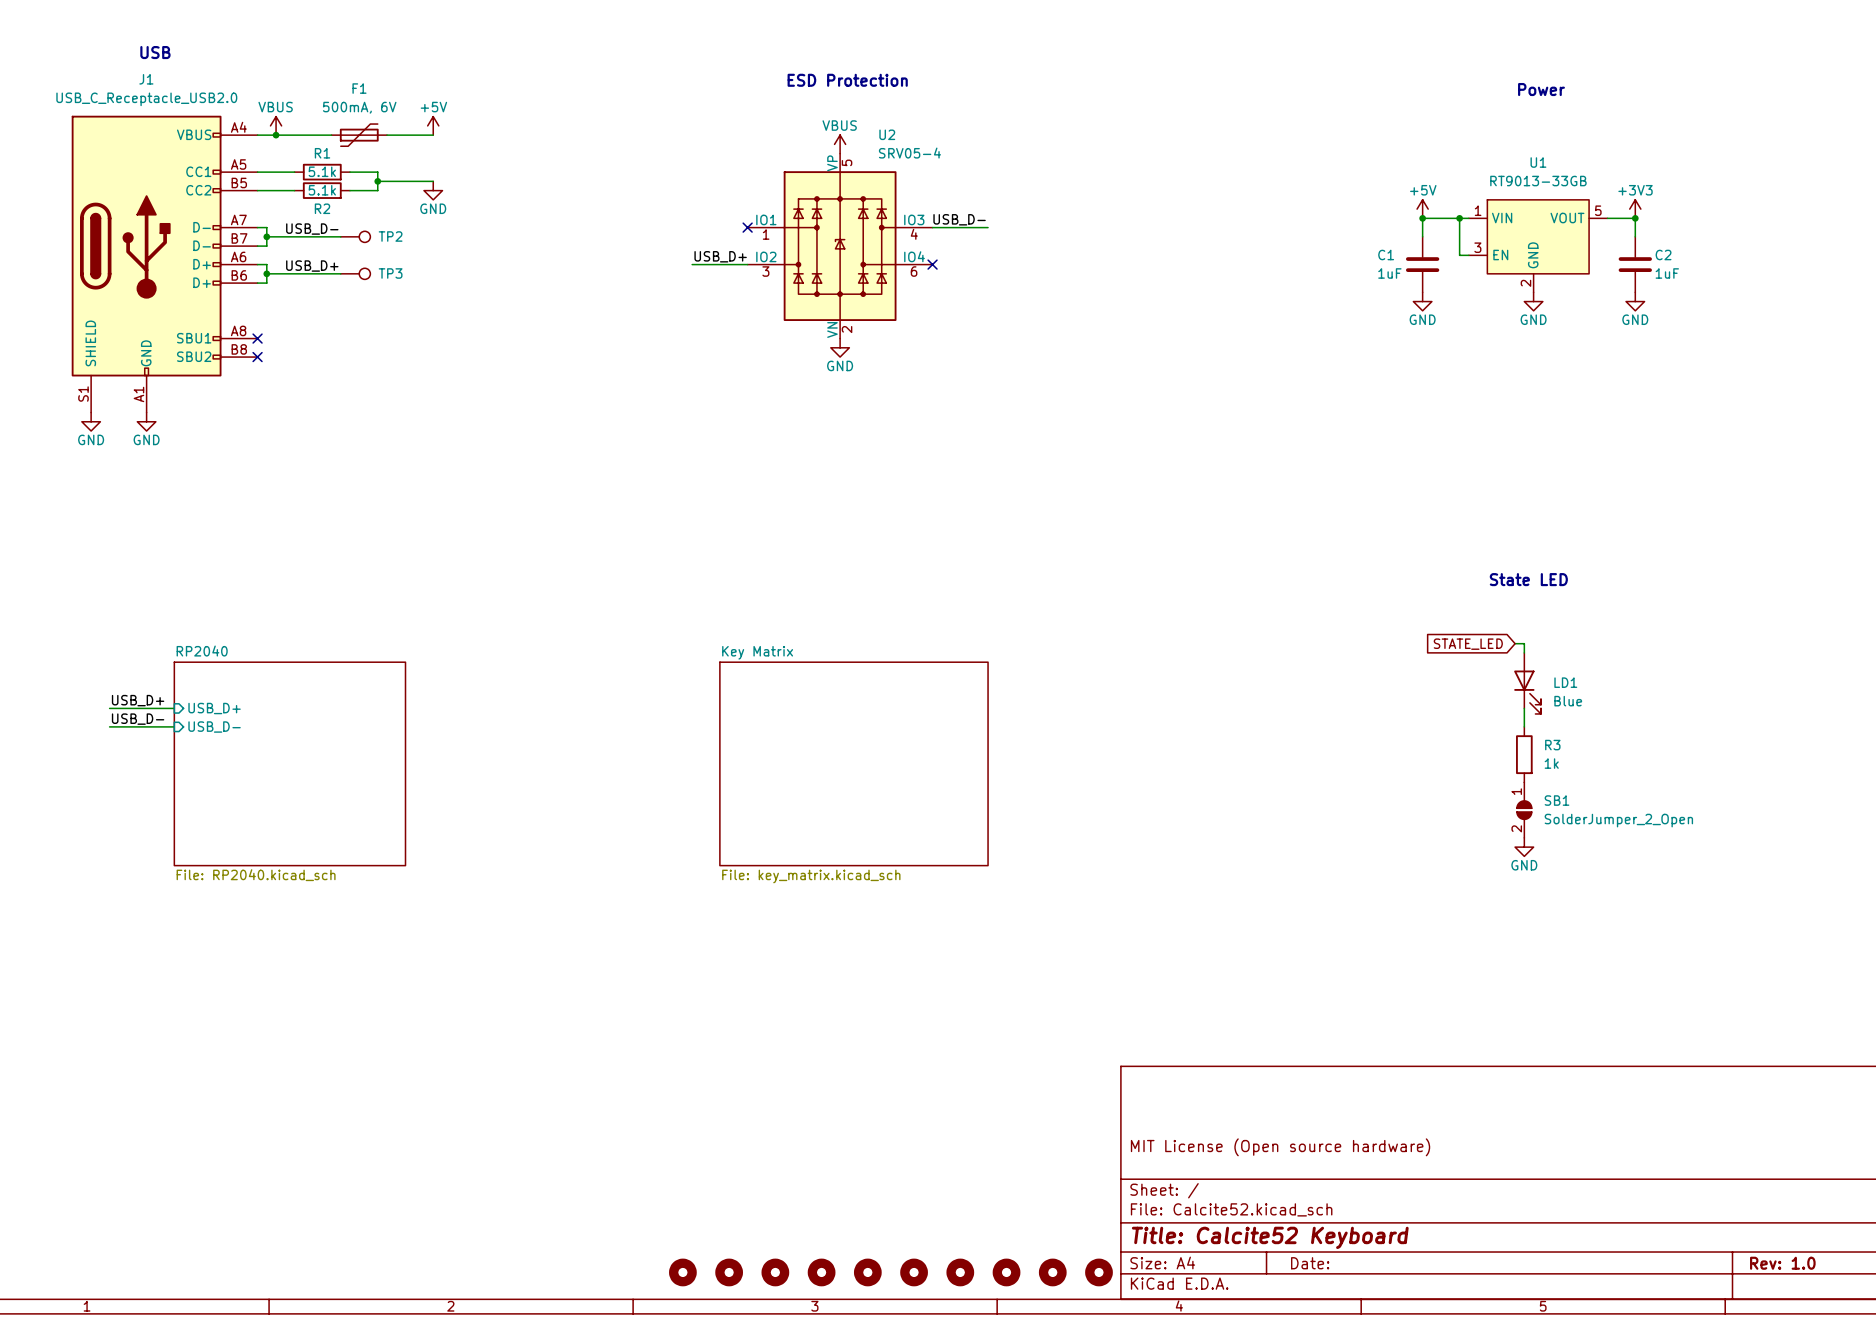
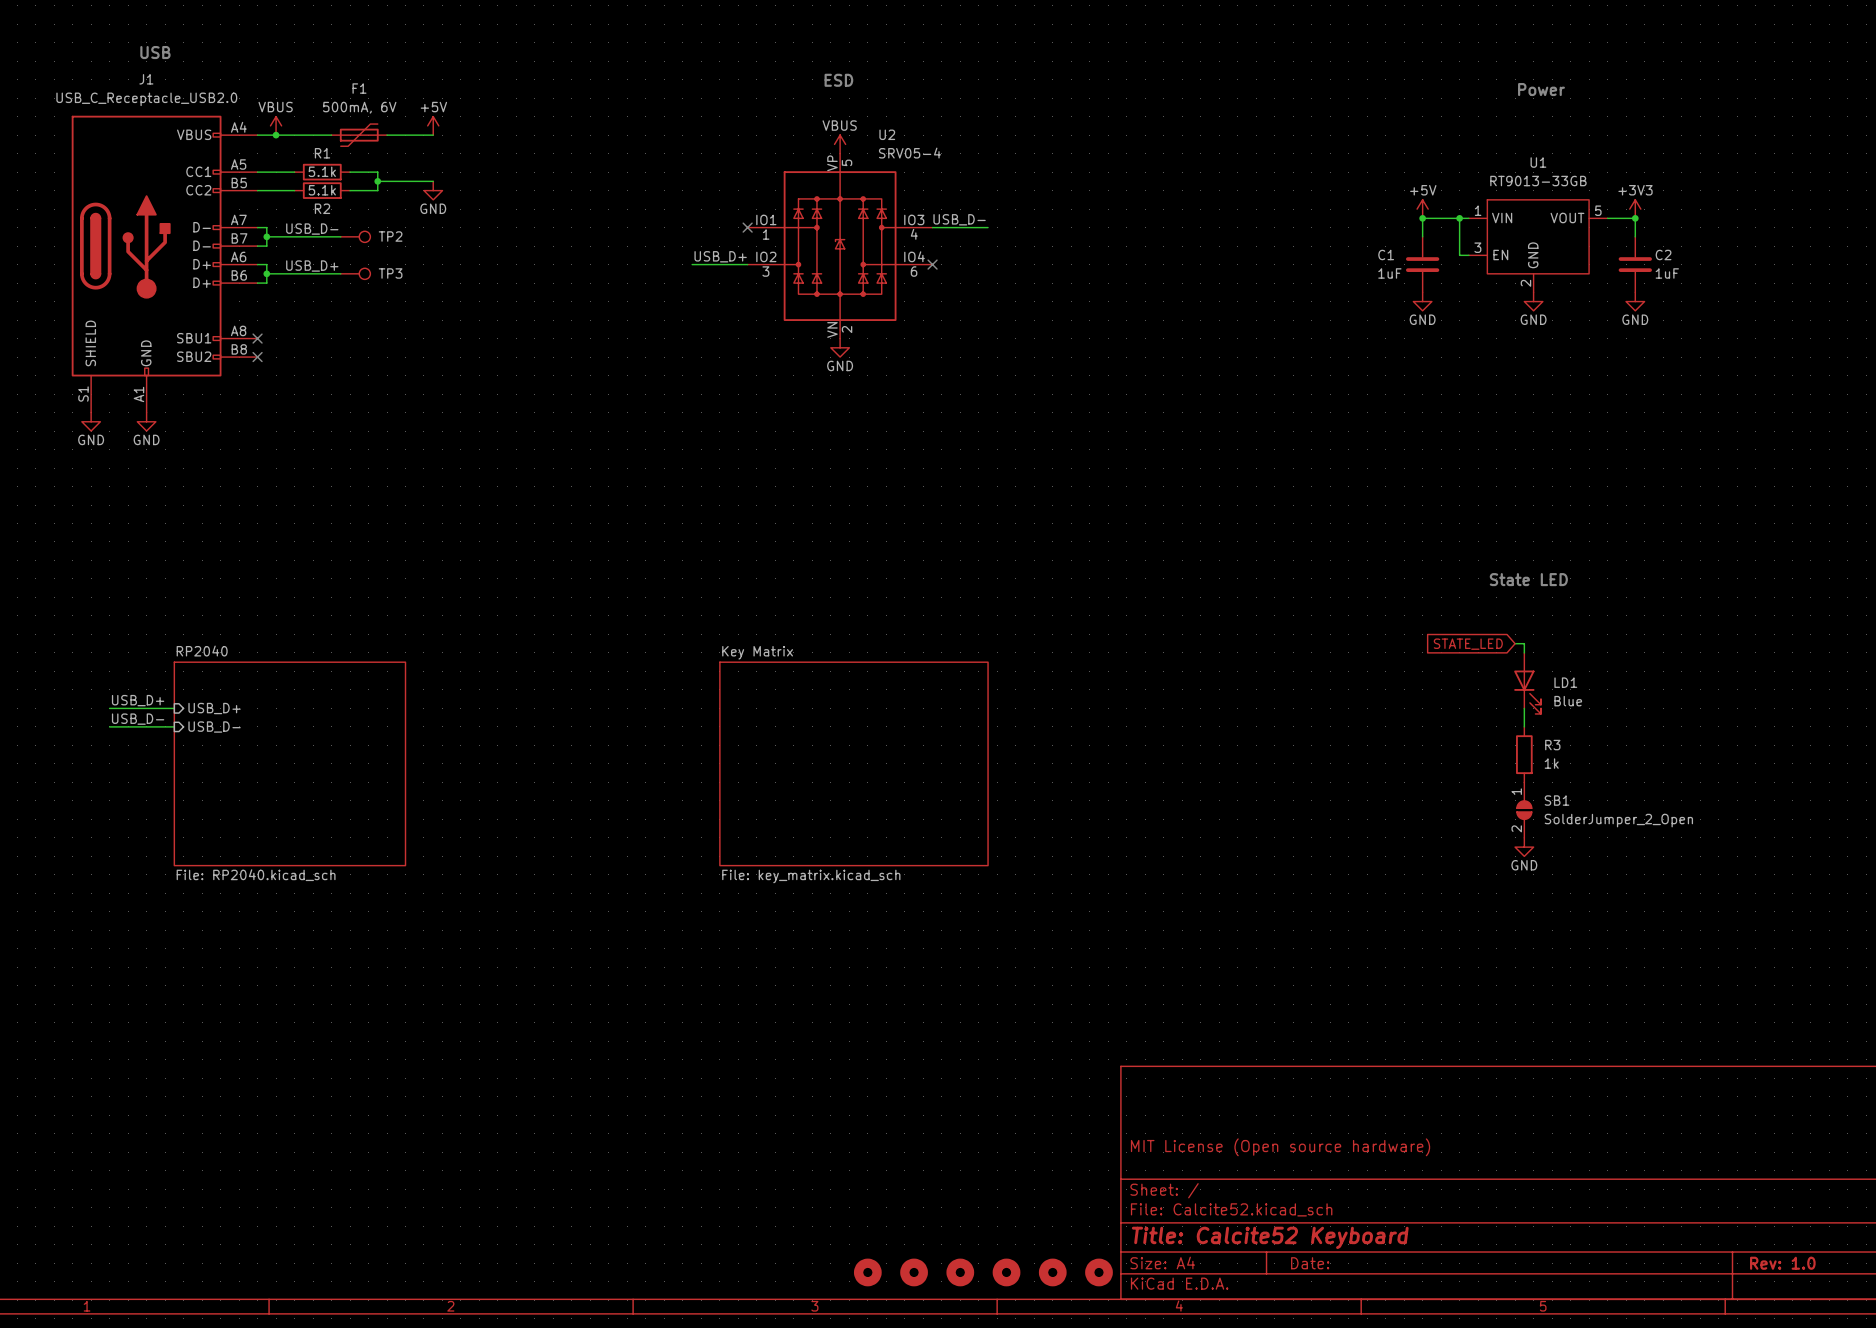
text: none -> ESD (838, 80)
text: ESD Protection (847, 80) -> none
part: (682, 1272) -> none
part: (729, 1272) -> none
part: (775, 1272) -> none
part: (821, 1272) -> none

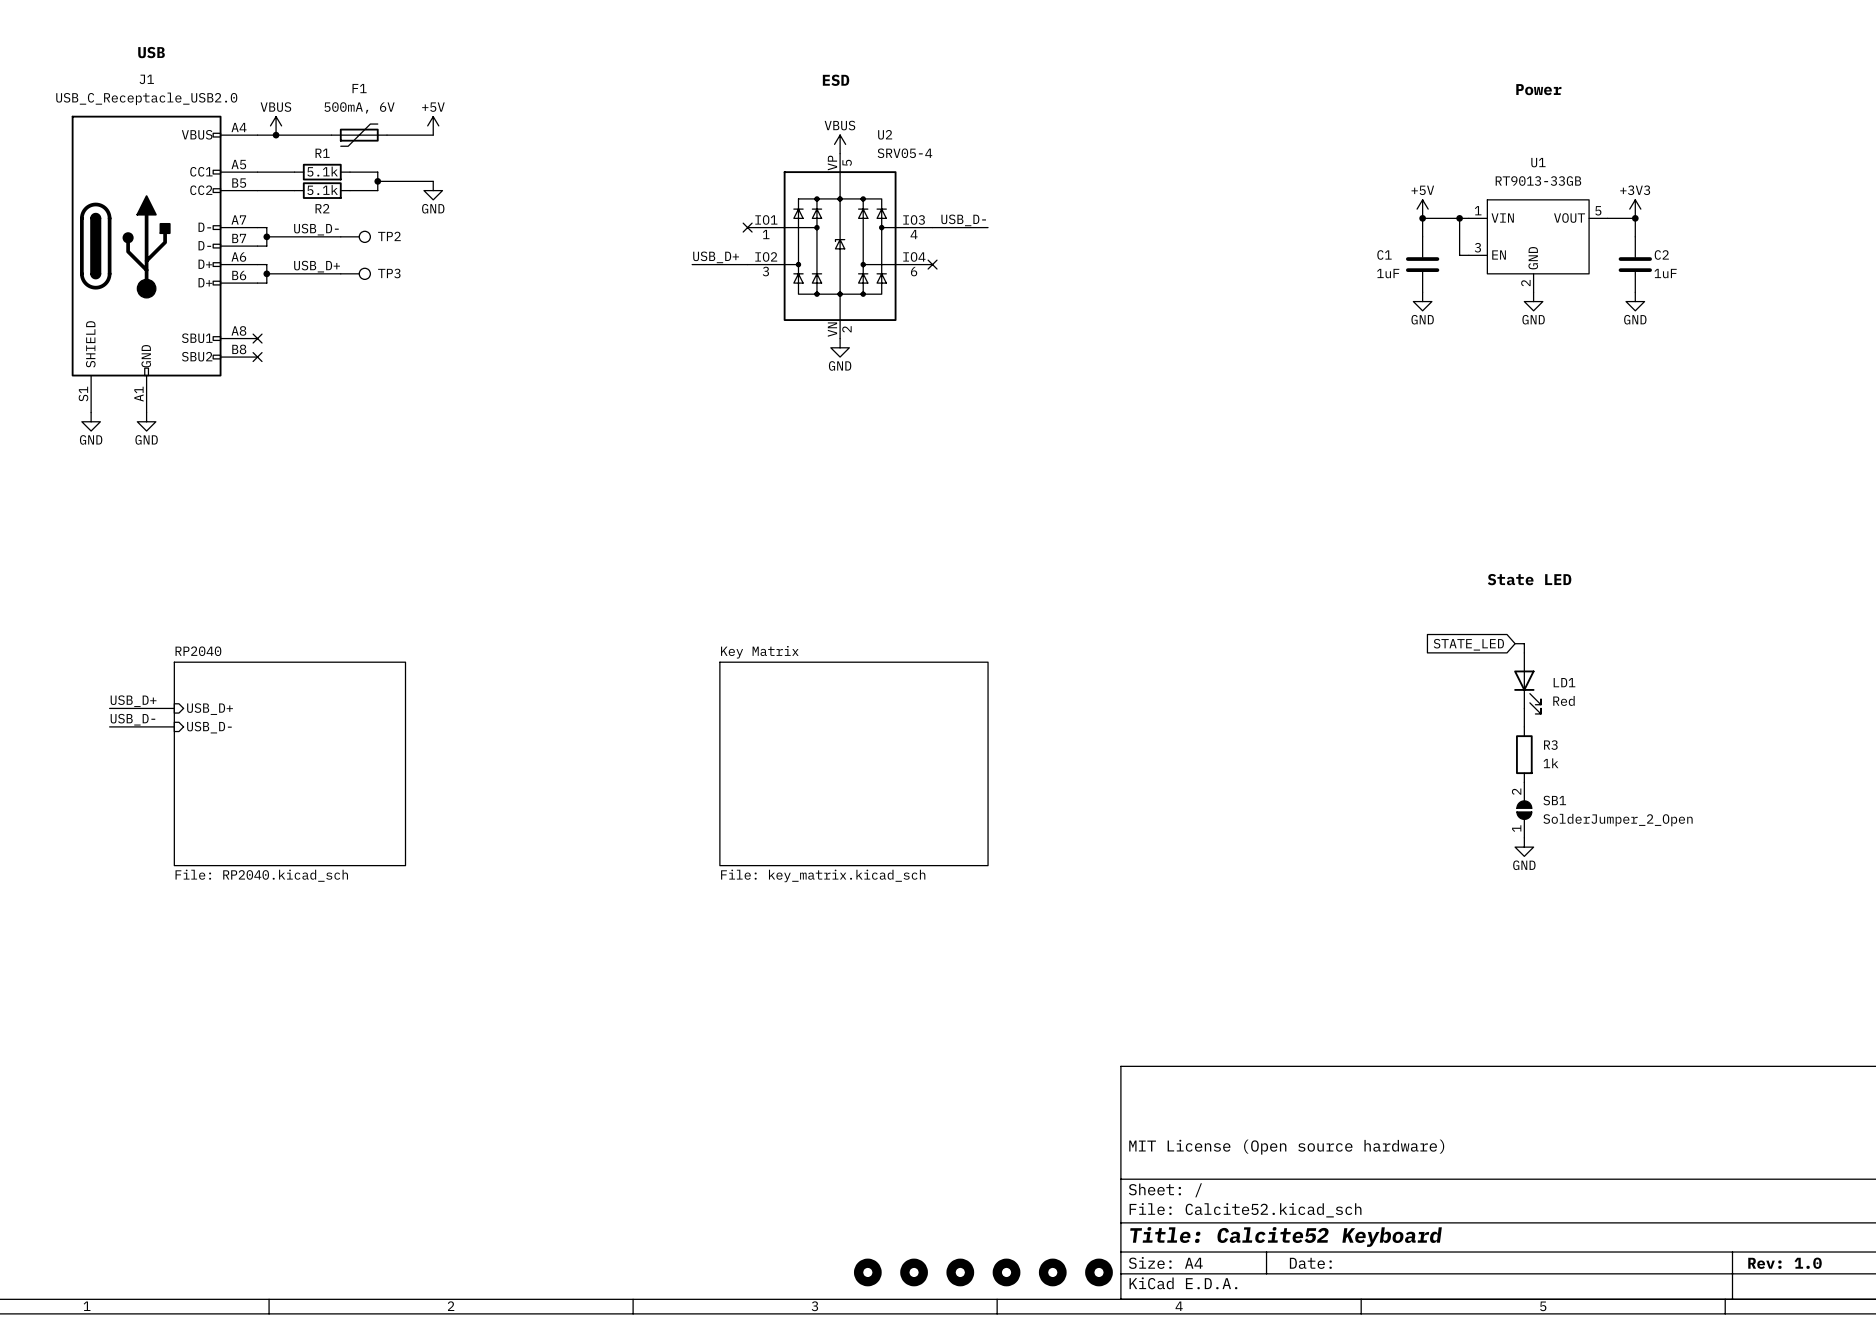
LD1 value: Blue (1568, 701) -> Red (1563, 700)
SB1 rotation: 0° (1524, 810) -> 180° (1524, 810)

